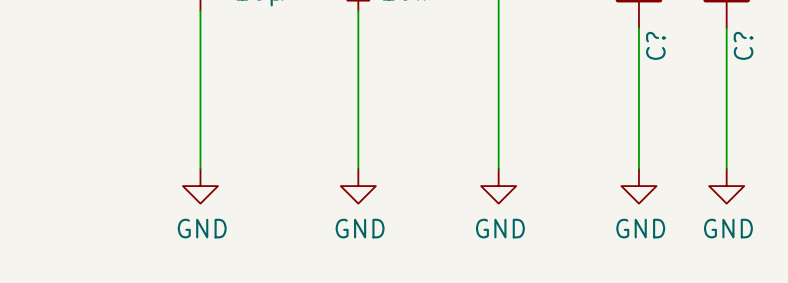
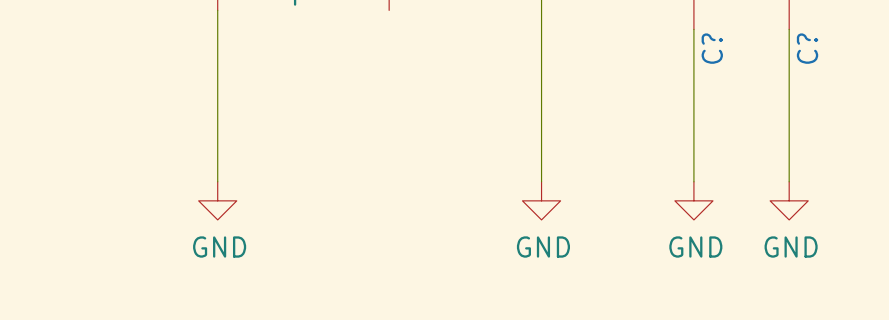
wire: (358, 10) (358, 168) -> none
power symbol: GND (358, 186) -> none

